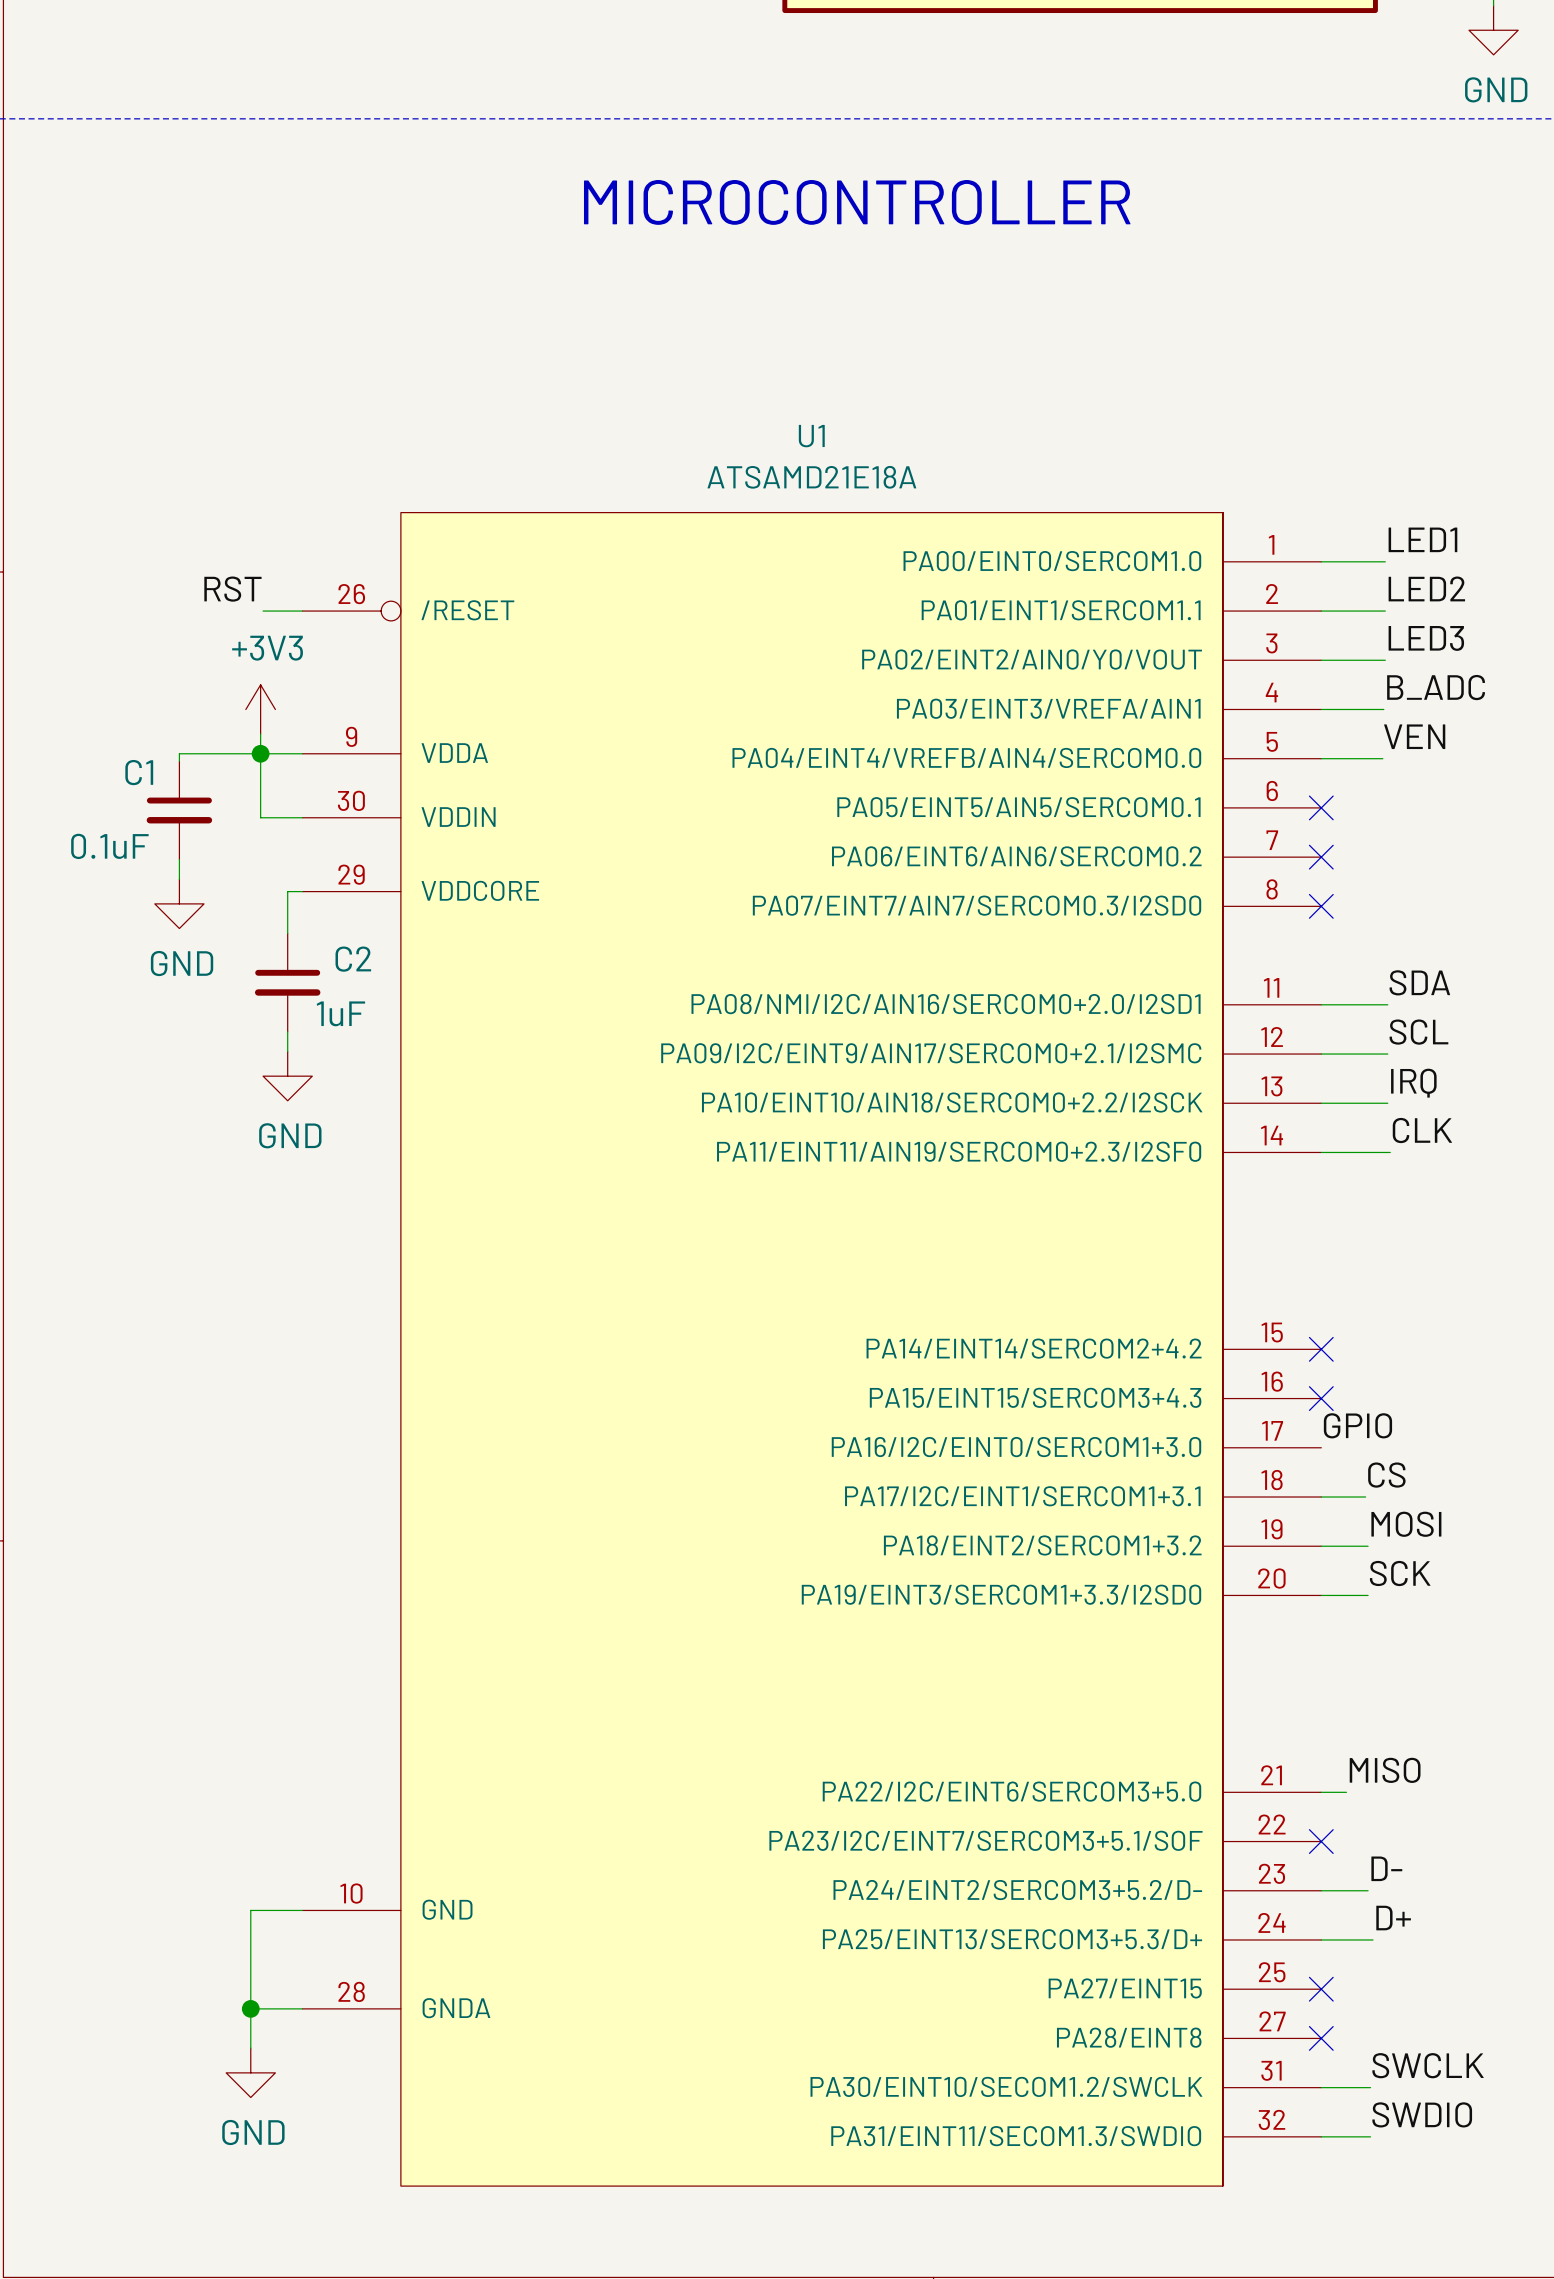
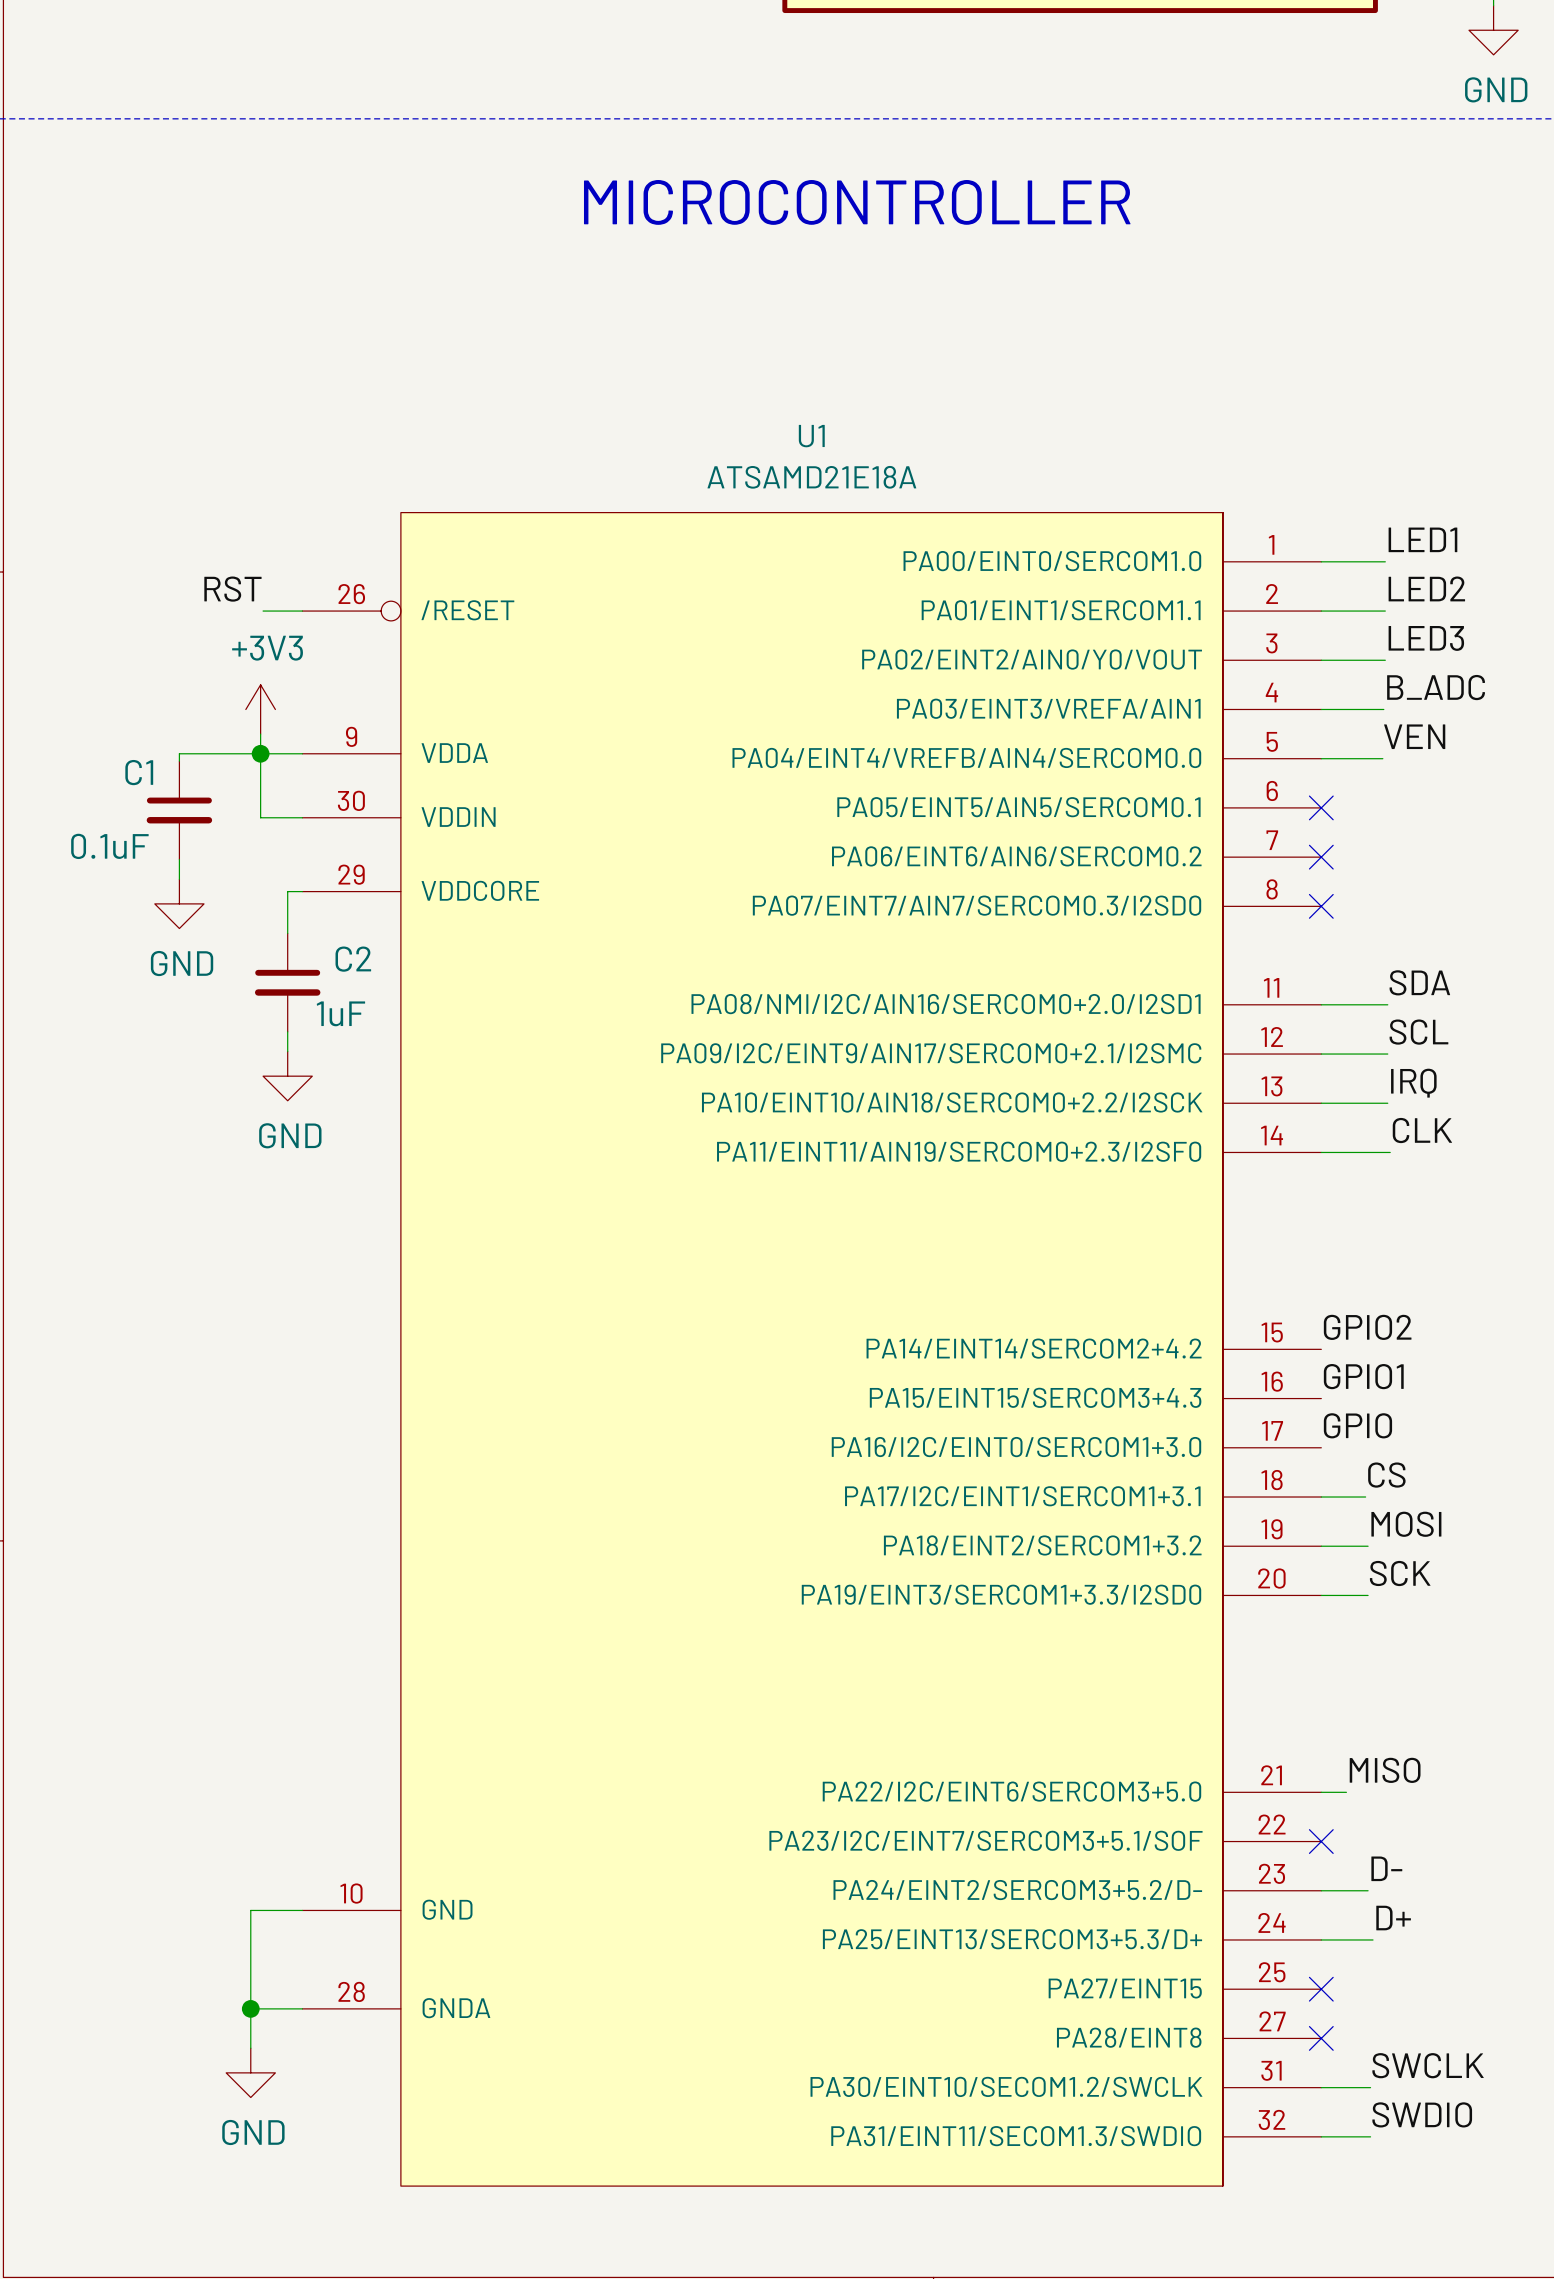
label: none -> GPIO2 (1367, 1327)
no-connect mark: (1321, 1349) -> none
label: none -> GPIO1 (1363, 1376)
no-connect mark: (1321, 1398) -> none

